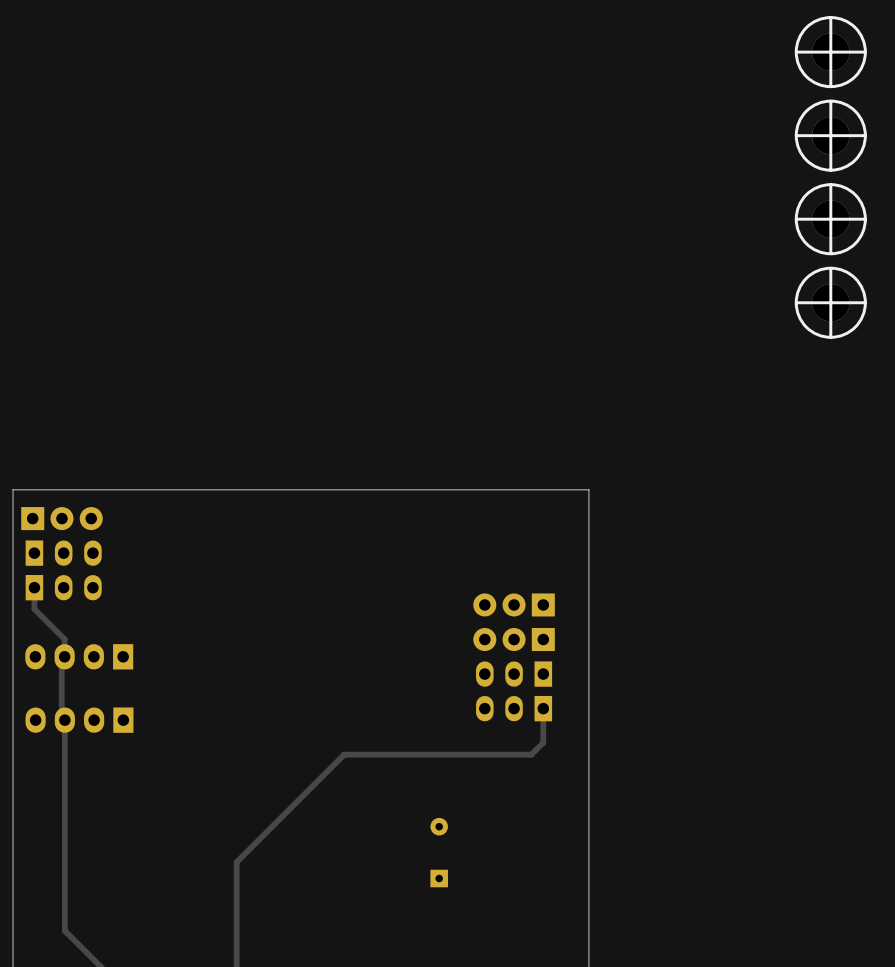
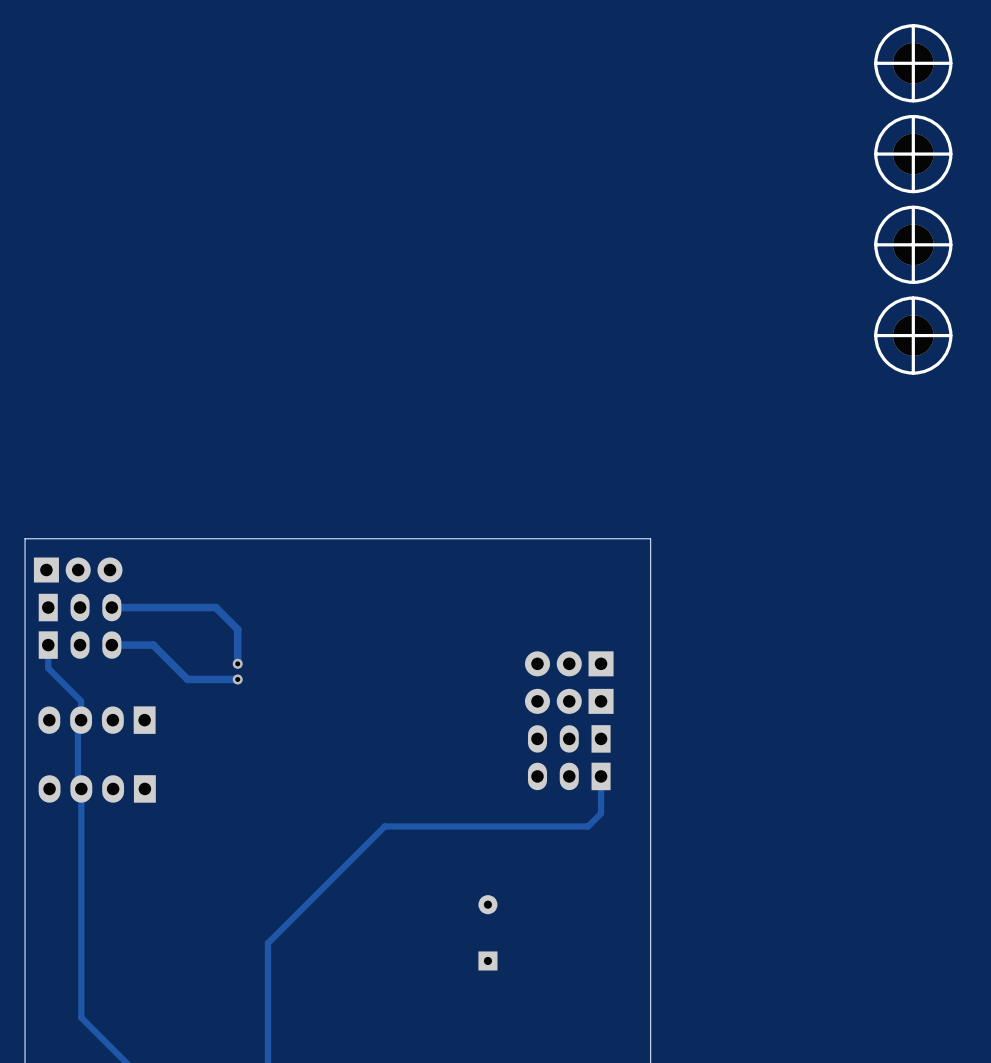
track: none -> (111, 607) (215, 607) (237, 629) (237, 663)
track: none -> (111, 645) (153, 645) (187, 679) (237, 679)
via: none -> (237, 663)
via: none -> (237, 679)

